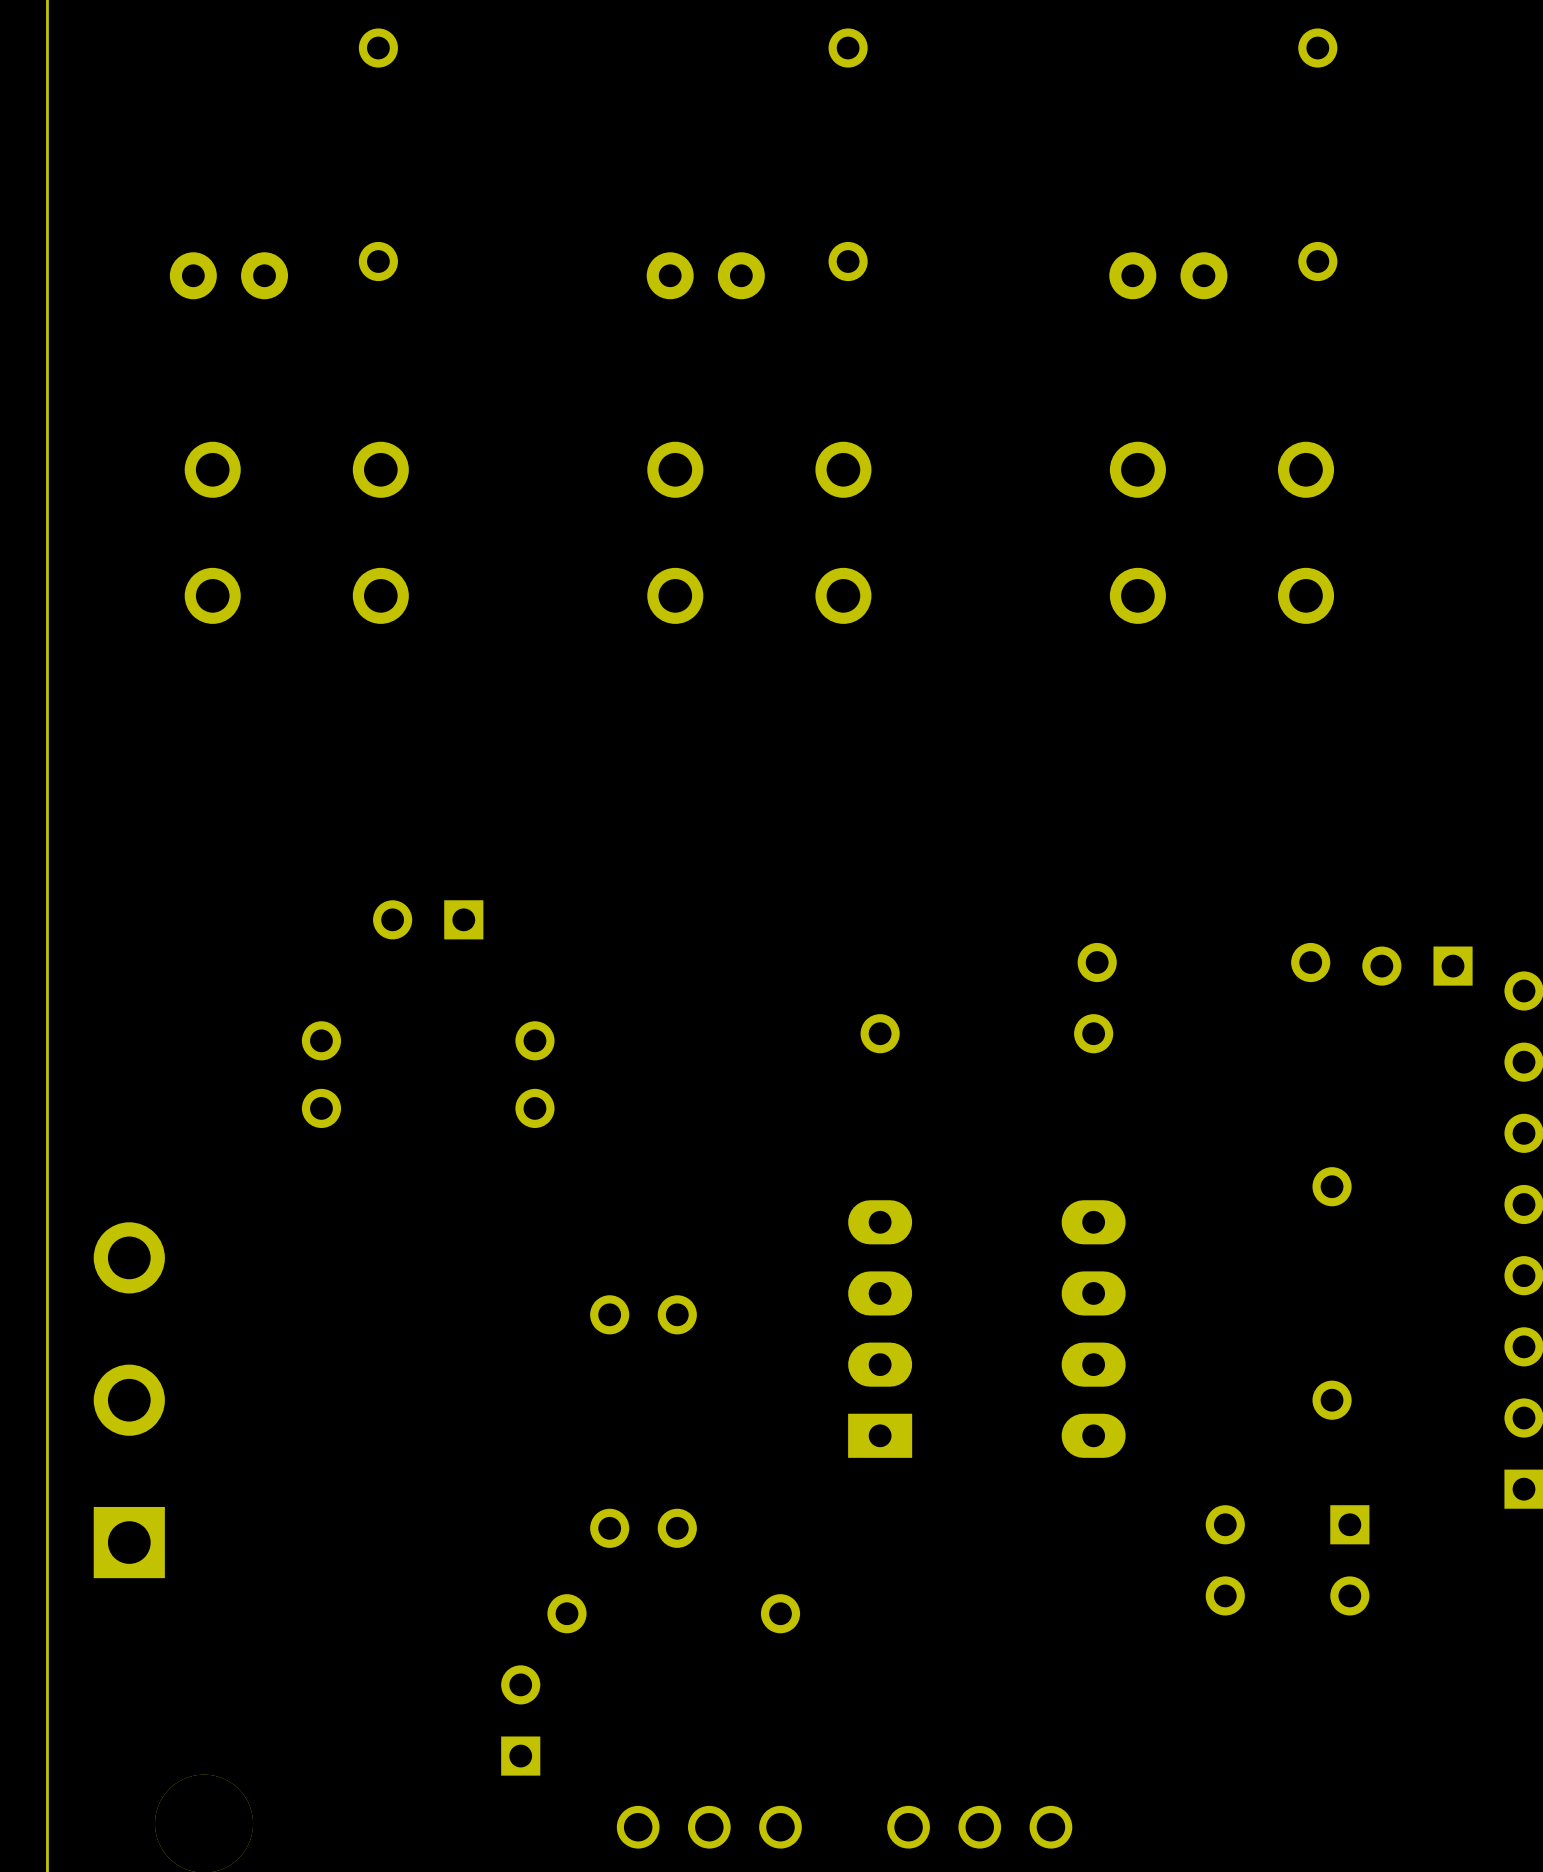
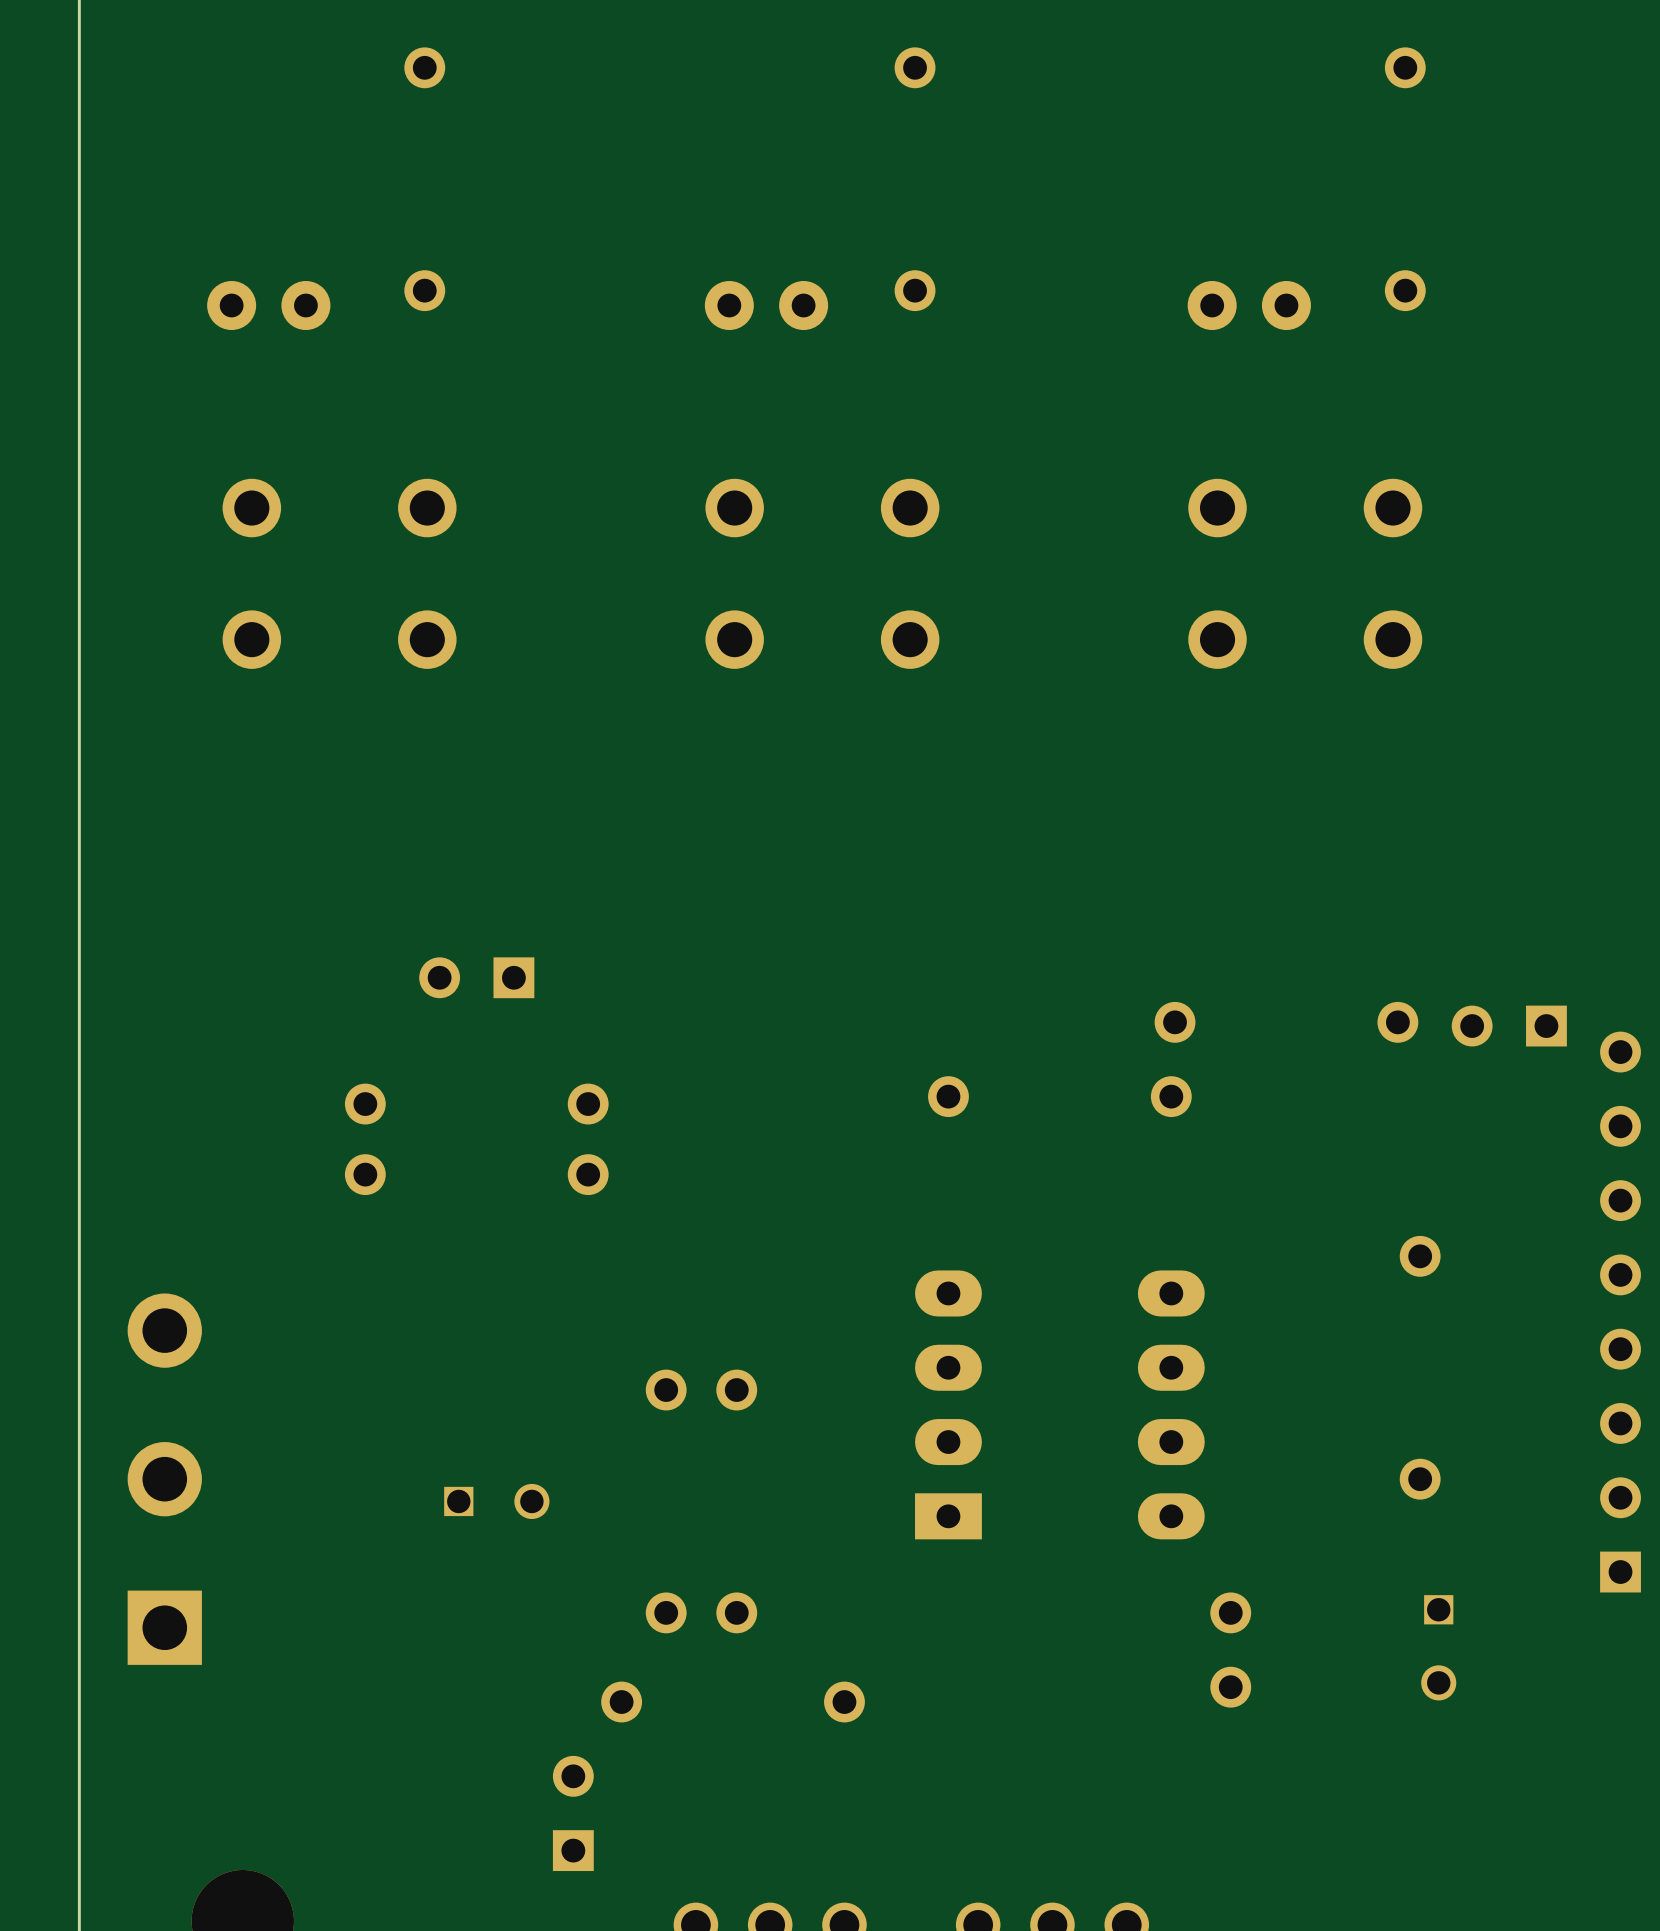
part: none -> (496, 1501)
part footprint: [1330, 1505, 1370, 1616] -> [1421, 1595, 1457, 1701]
part position: (1225, 1560) -> (1230, 1650)

